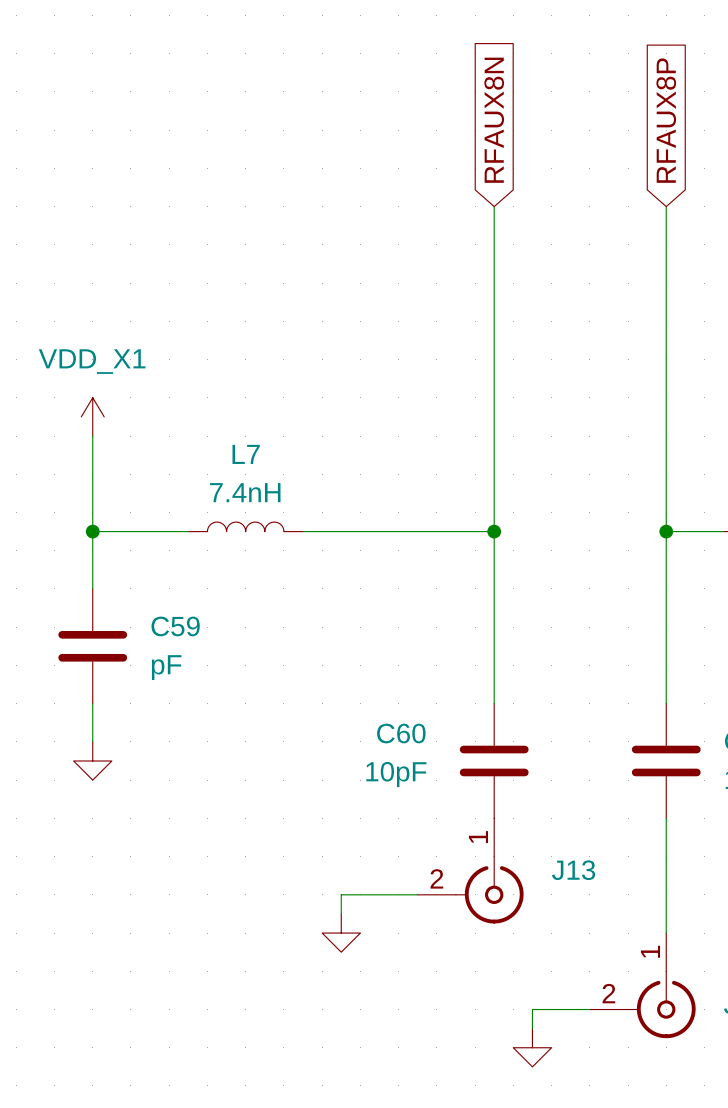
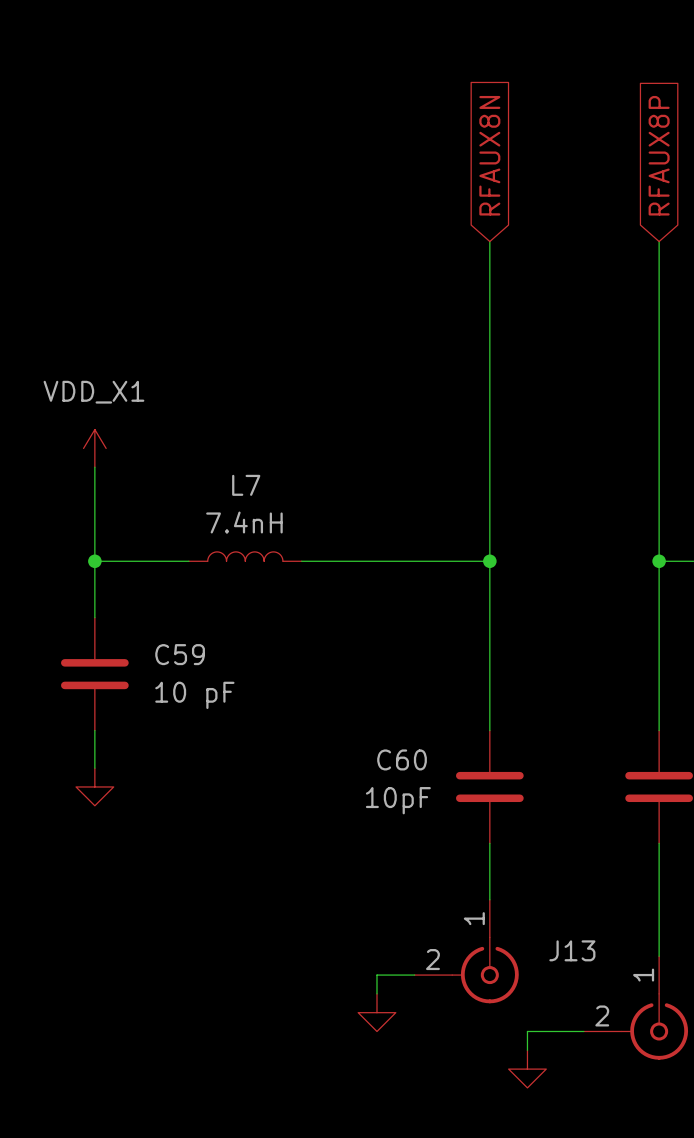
C59 value: pF (166, 667) -> 10 pF (194, 695)
J13 position: (470, 870) -> (466, 951)
wire: (417, 894) (341, 894) (341, 913) -> none
power symbol position: (341, 933) -> (376, 1012)
wire: none -> (414, 975) (376, 975) (376, 993)

